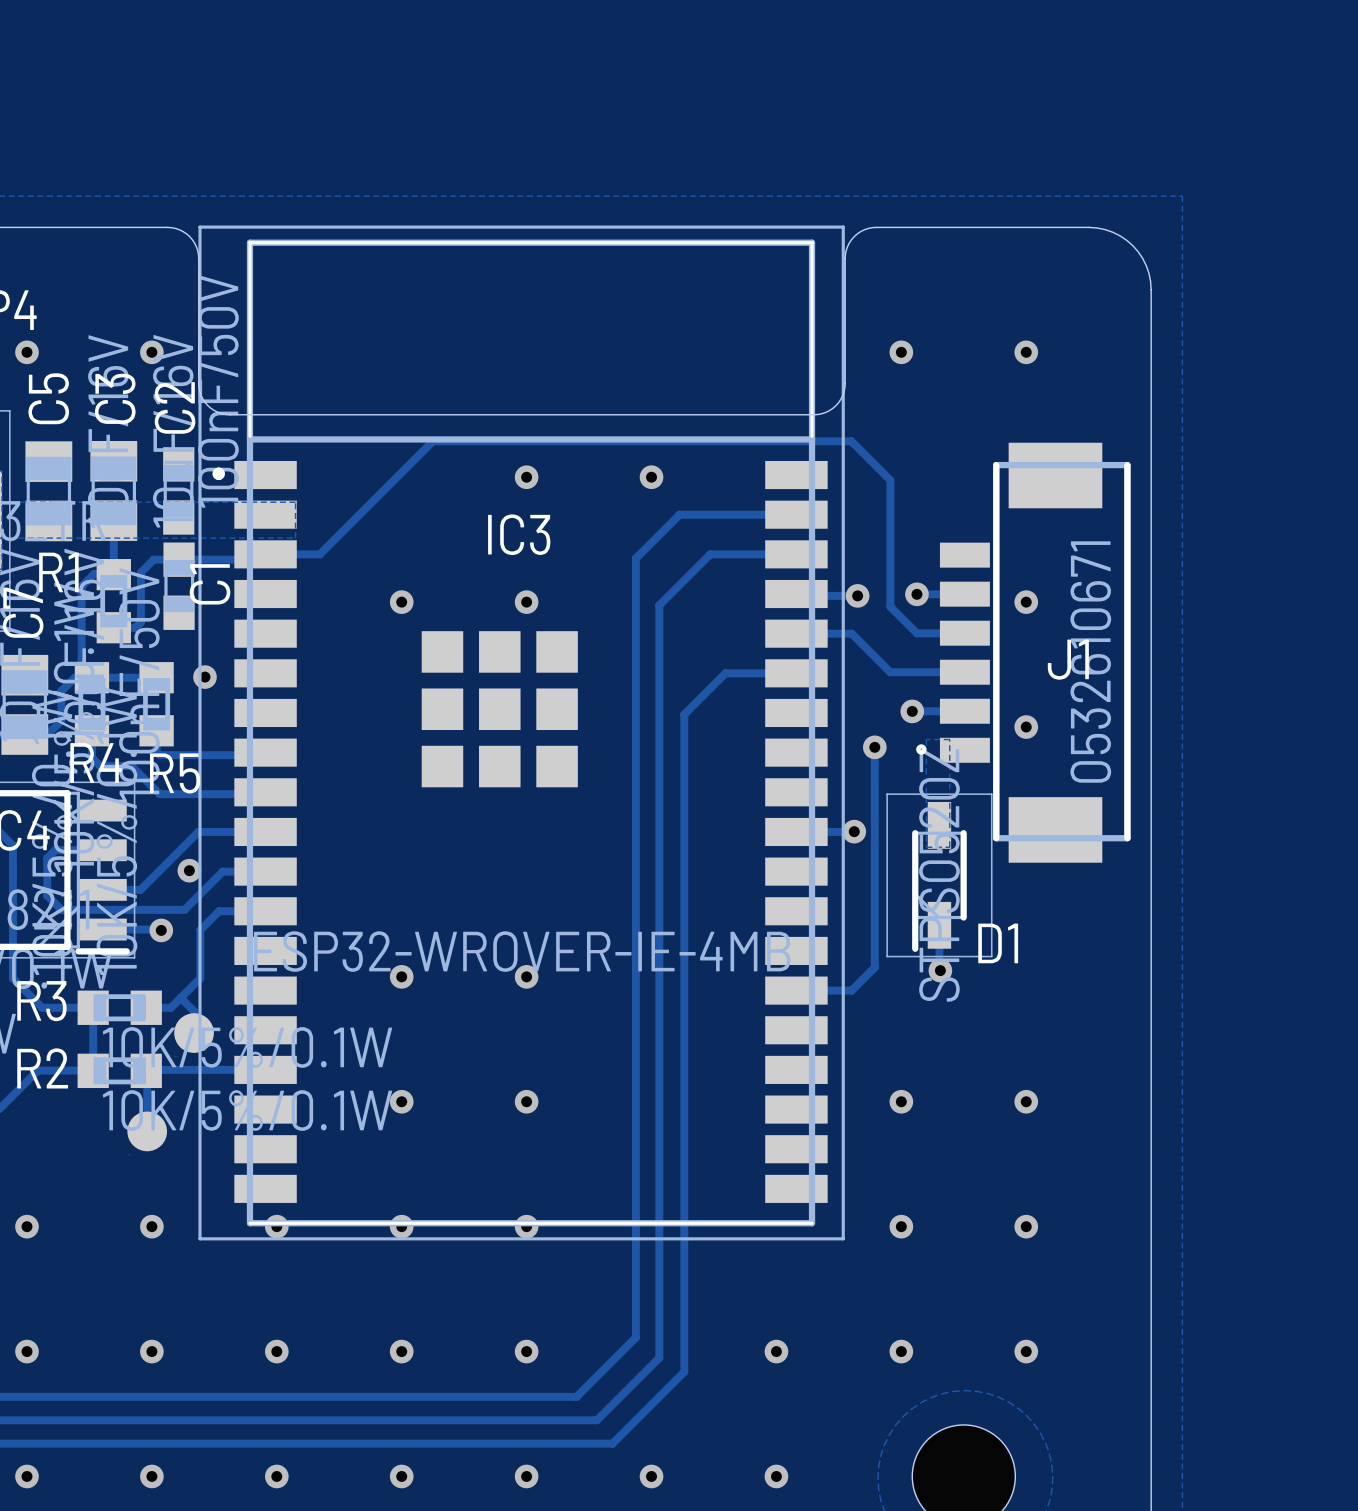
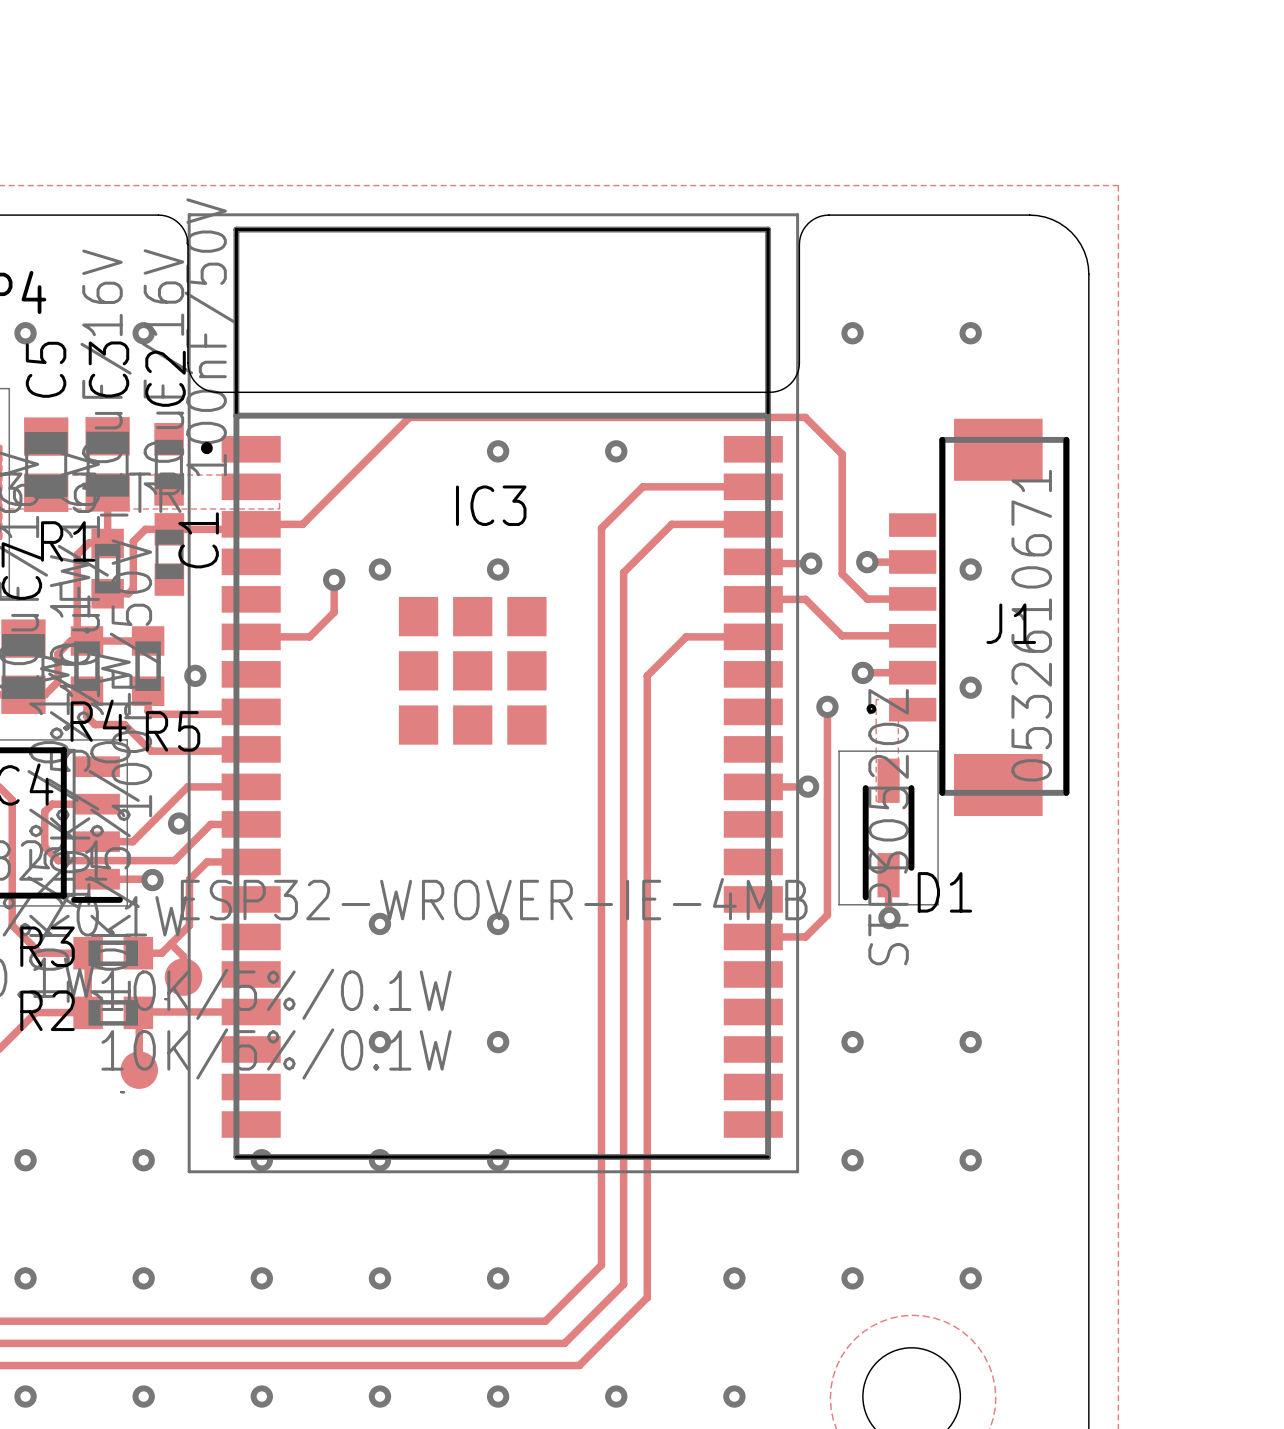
track: none -> (334, 579) (334, 612) (309, 636) (251, 636)
via: none -> (334, 579)
via position: (204, 677) -> (195, 675)

